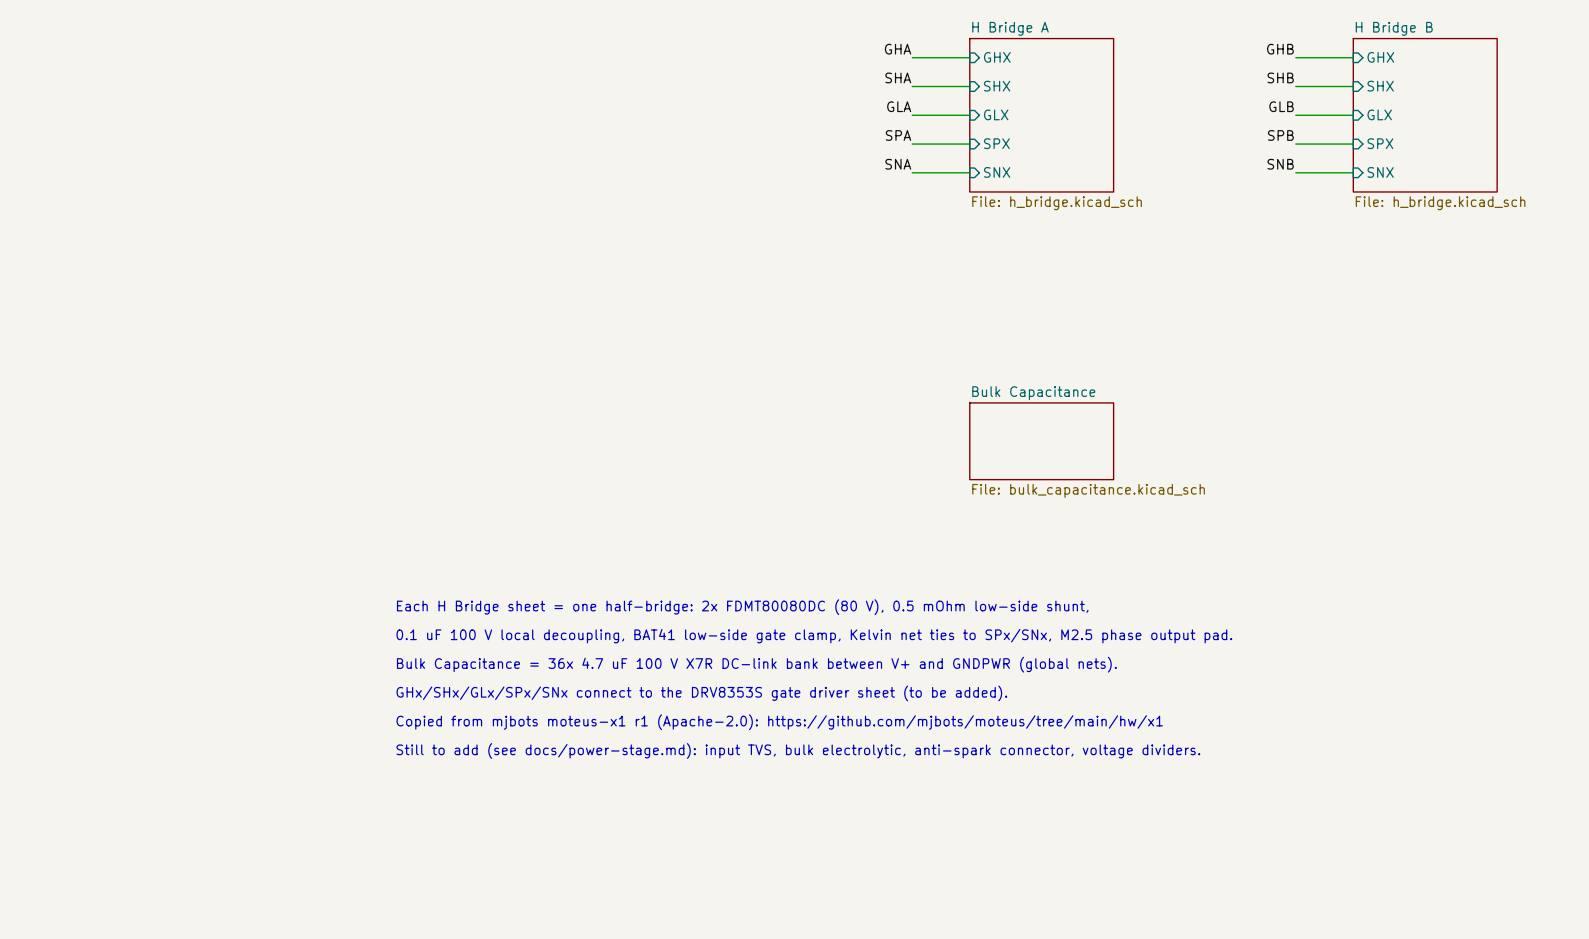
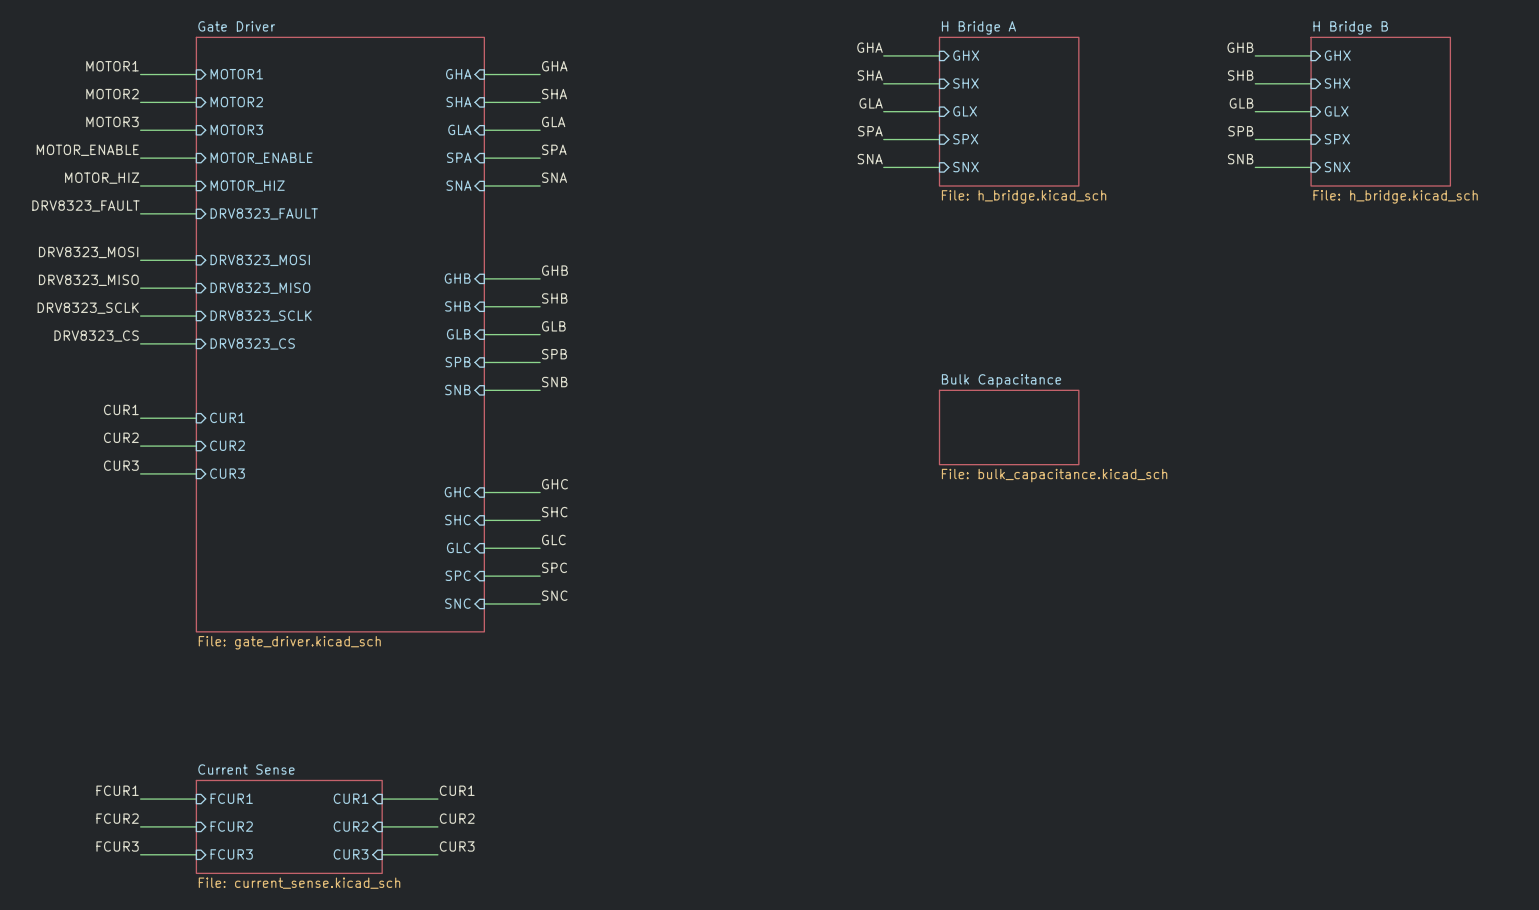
label: none -> MOTOR1 (112, 66)
label: none -> GHA (554, 66)
wire: none -> (140, 74) (196, 74)
sheet pin: none -> MOTOR1 (236, 74)
sheet pin: none -> GHA (458, 74)
wire: none -> (484, 74) (540, 74)
label: none -> MOTOR2 (112, 94)
label: none -> SHA (554, 94)
wire: none -> (140, 102) (196, 102)
sheet pin: none -> MOTOR2 (236, 102)
sheet pin: none -> SHA (458, 102)
wire: none -> (484, 102) (540, 102)
label: none -> MOTOR3 (112, 121)
label: none -> GLA (553, 121)
wire: none -> (140, 130) (196, 130)
sheet pin: none -> MOTOR3 (236, 129)
sheet pin: none -> GLA (459, 129)
wire: none -> (484, 130) (540, 130)
label: none -> SPA (554, 149)
label: none -> MOTOR_ENABLE (87, 150)
sheet pin: none -> SPA (459, 157)
wire: none -> (140, 158) (196, 158)
sheet pin: none -> MOTOR_ENABLE (261, 158)
wire: none -> (484, 158) (540, 158)
label: none -> MOTOR_HIZ (102, 178)
label: none -> SNA (554, 177)
wire: none -> (140, 185) (196, 185)
sheet pin: none -> SNA (458, 185)
wire: none -> (484, 185) (540, 185)
sheet pin: none -> MOTOR_HIZ (247, 186)
label: none -> DRV8323_FAULT (85, 206)
wire: none -> (140, 213) (196, 213)
sheet pin: none -> DRV8323_FAULT (264, 213)
label: none -> DRV8323_MOSI (88, 252)
wire: none -> (140, 260) (196, 260)
sheet pin: none -> DRV8323_MOSI (260, 260)
label: none -> GHB (554, 270)
sheet pin: none -> GHB (457, 278)
wire: none -> (484, 278) (540, 278)
label: none -> DRV8323_MISO (88, 280)
wire: none -> (140, 288) (196, 288)
sheet pin: none -> DRV8323_MISO (260, 288)
label: none -> SHB (554, 298)
sheet pin: none -> SHB (457, 306)
wire: none -> (484, 306) (540, 306)
label: none -> DRV8323_SCLK (88, 308)
wire: none -> (140, 316) (196, 316)
sheet pin: none -> DRV8323_SCLK (261, 316)
label: none -> GLB (553, 326)
sheet Gate Driver: none -> File: gate_driver.kicad_sch (340, 334)
sheet pin: none -> GLB (458, 334)
wire: none -> (484, 334) (540, 334)
label: none -> DRV8323_CS (96, 336)
wire: none -> (140, 343) (196, 343)
sheet pin: none -> DRV8323_CS (252, 343)
label: none -> SPB (554, 354)
sheet pin: none -> SPB (458, 362)
wire: none -> (484, 362) (540, 362)
label: none -> SNB (554, 382)
sheet pin: none -> SNB (457, 390)
wire: none -> (484, 390) (540, 390)
label: none -> CUR1 (121, 409)
wire: none -> (140, 418) (196, 418)
sheet pin: none -> CUR1 (227, 417)
label: none -> CUR2 (121, 437)
wire: none -> (140, 446) (196, 446)
sheet pin: none -> CUR2 (227, 445)
label: none -> CUR3 (121, 465)
sheet pin: none -> CUR3 (227, 473)
wire: none -> (140, 473) (196, 473)
label: none -> GHC (554, 484)
sheet pin: none -> GHC (457, 492)
wire: none -> (484, 492) (540, 492)
label: none -> SHC (554, 512)
sheet pin: none -> SHC (457, 520)
wire: none -> (484, 520) (540, 520)
label: none -> GLC (553, 539)
sheet pin: none -> GLC (458, 547)
wire: none -> (484, 548) (540, 548)
label: none -> SPC (554, 567)
sheet pin: none -> SPC (458, 575)
wire: none -> (484, 576) (540, 576)
text: Each H Bridge sheet = one half-bridge: 2x FDMT80080DC (80 V), 0.5 mOhm low-side shunt, (742, 607) -> none
label: none -> SNC (554, 595)
sheet pin: none -> SNC (457, 603)
wire: none -> (484, 603) (540, 603)
text: 0.1 uF 100 V local decoupling, BAT41 low-side gate clamp, Kelvin net ties to SPx/SNx, M2.5 phase output pad. (814, 636) -> none
text: Bulk Capacitance = 36x 4.7 uF 100 V X7R DC-link bank between V+ and GNDPWR (global nets). (756, 664) -> none
text: GHx/SHx/GLx/SPx/SNx connect to the DRV8353S gate driver sheet (to be added). (701, 693) -> none
text: Copied from mjbots moteus-x1 r1 (Apache-2.0): https://github.com/mjbots/moteus/tree/main/hw/x1 (779, 722) -> none
text: Still to add (see docs/power-stage.md): input TVS, bulk electrolytic, anti-spark connector, voltage dividers. (798, 750) -> none
label: none -> FCUR1 (117, 790)
label: none -> CUR1 (457, 790)
wire: none -> (140, 799) (196, 799)
sheet pin: none -> FCUR1 (231, 798)
sheet pin: none -> CUR1 (351, 798)
wire: none -> (382, 799) (437, 799)
label: none -> FCUR2 (117, 818)
label: none -> CUR2 (457, 818)
wire: none -> (140, 826) (196, 826)
sheet pin: none -> FCUR2 (231, 826)
sheet Current Sense: none -> File: current_sense.kicad_sch (289, 826)
sheet pin: none -> CUR2 (351, 826)
wire: none -> (382, 826) (437, 826)
label: none -> FCUR3 (117, 846)
label: none -> CUR3 (457, 846)
sheet pin: none -> FCUR3 (231, 854)
sheet pin: none -> CUR3 (351, 854)
wire: none -> (140, 854) (196, 854)
wire: none -> (382, 854) (437, 854)

